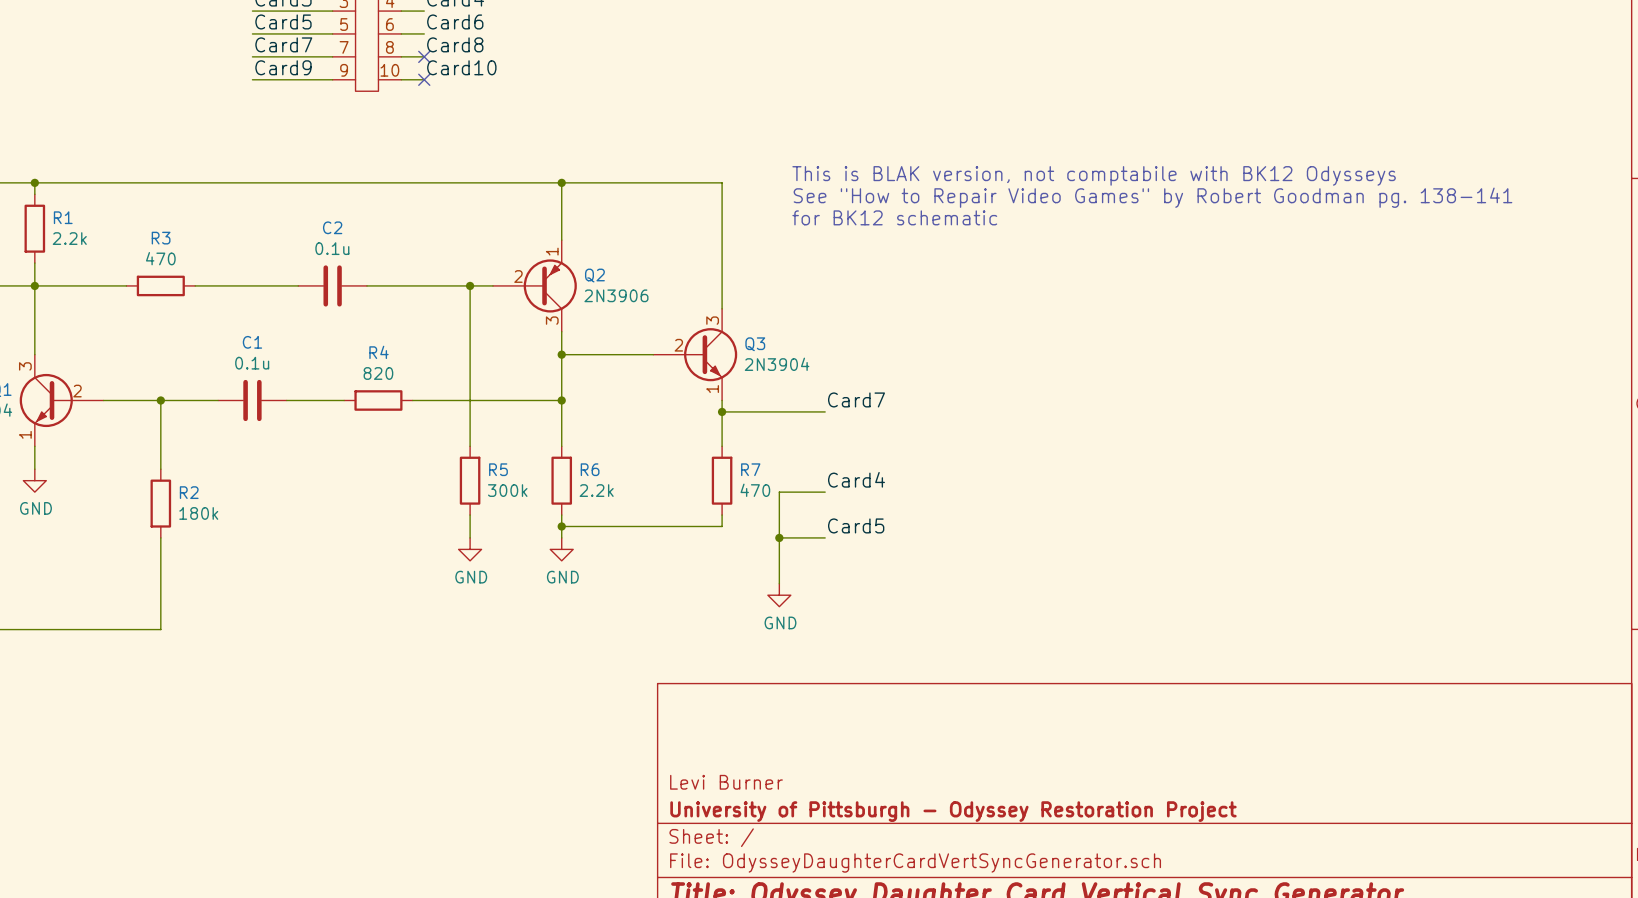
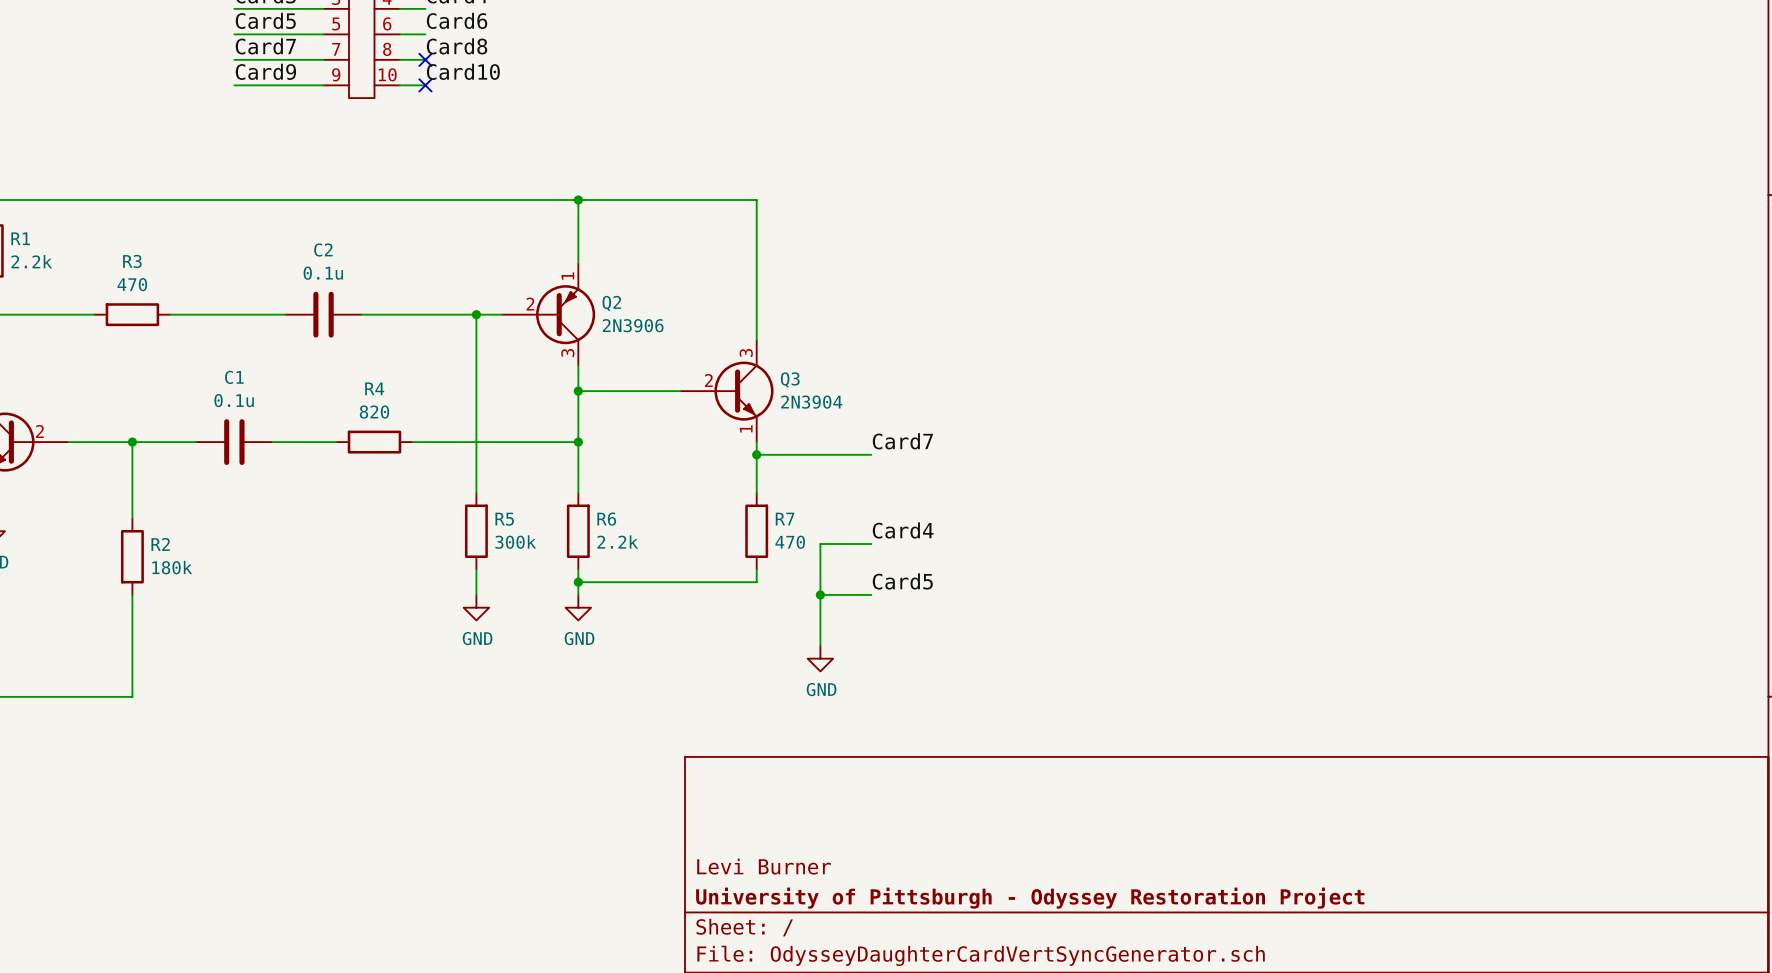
text: This is BLAK version, not comptabile with BK12 Odysseys (1094, 175) -> none
text: See "How to Repair Video Games" by Robert Goodman pg. 138-141 (1152, 197) -> none
text: for BK12 schematic (894, 217) -> none

